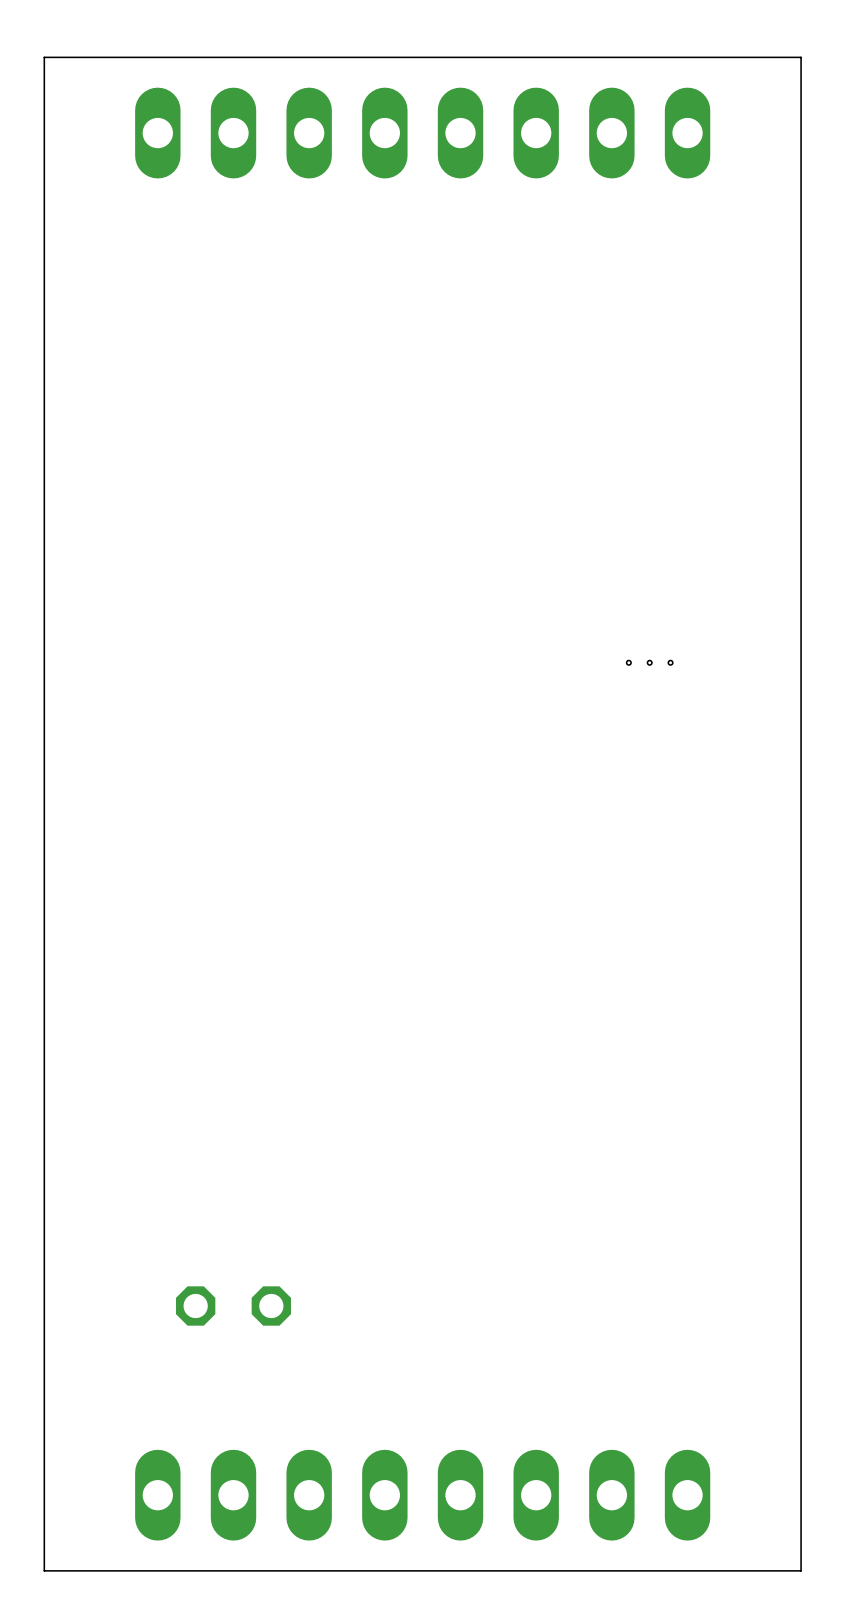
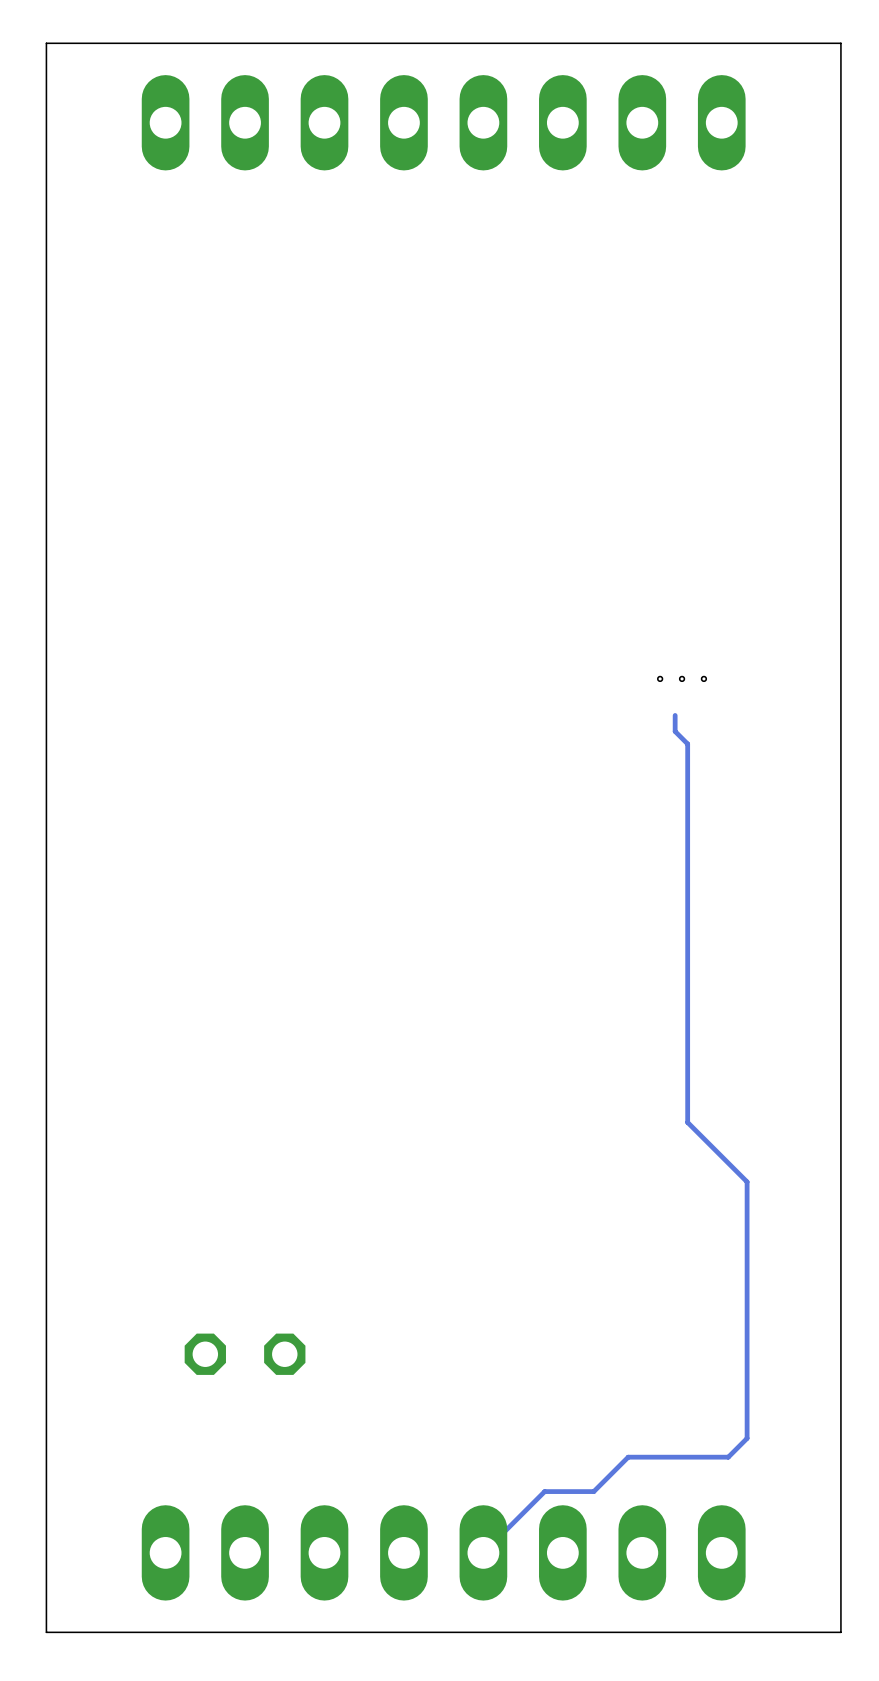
track: none -> (675, 715) (675, 731) (687, 743) (687, 1122) (747, 1181) (747, 1438) (728, 1457) (628, 1457) (593, 1491) (544, 1491) (483, 1552)

